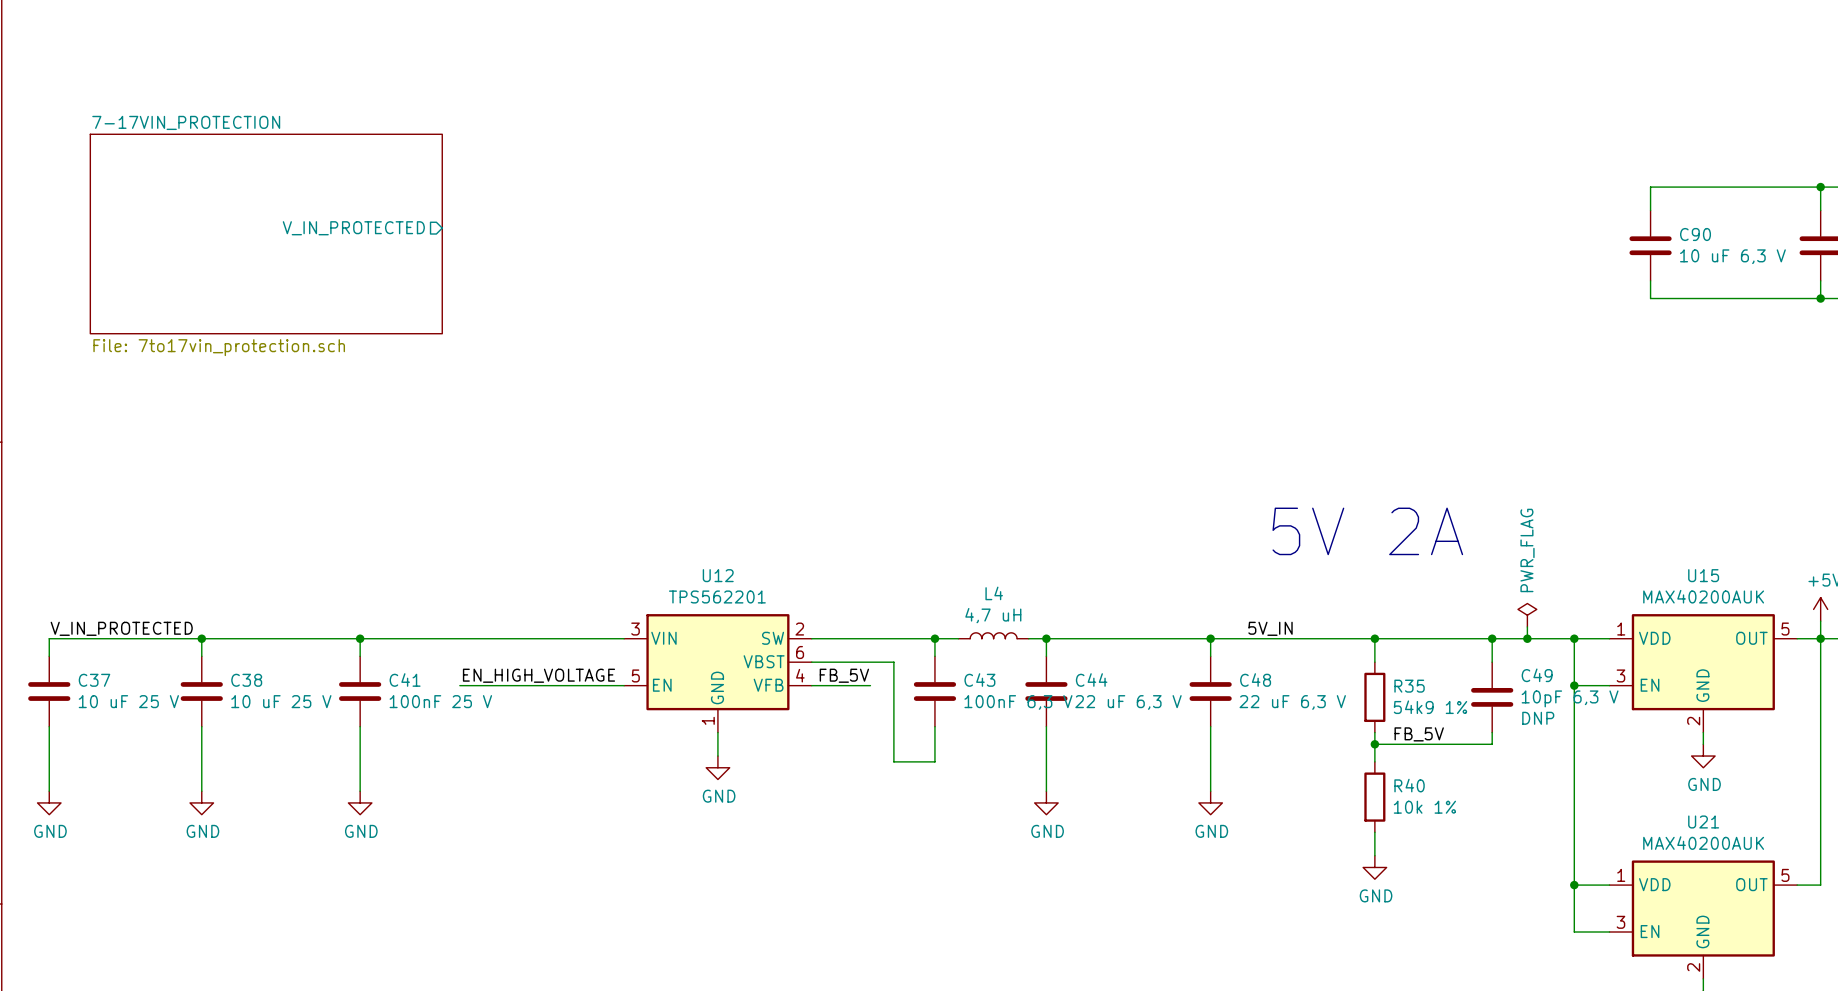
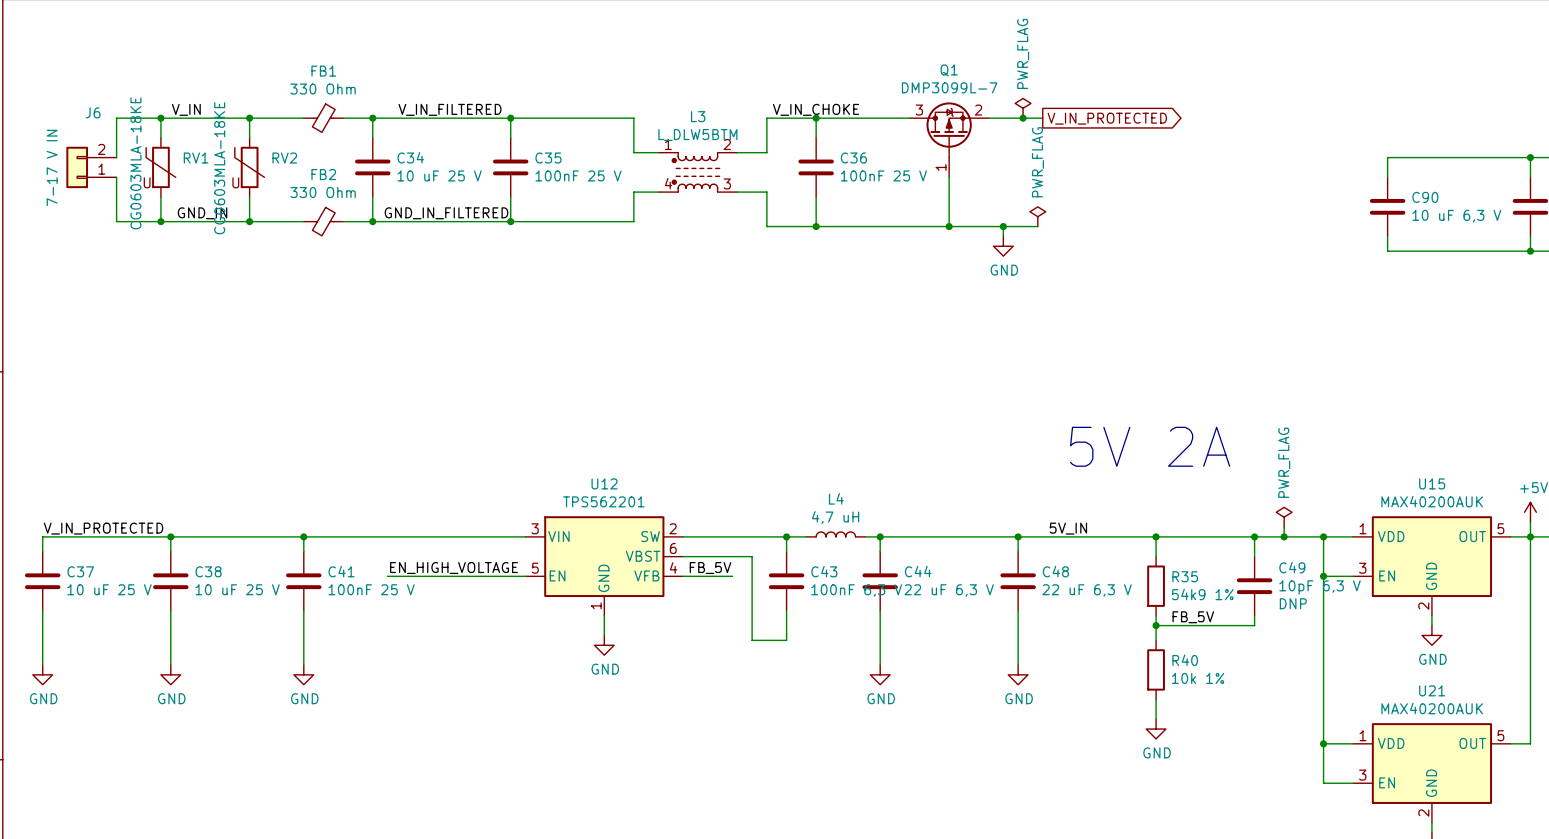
power symbol: none -> PWR_FLAG (1023, 108)
label: none -> V_IN (186, 109)
label: none -> V_IN_FILTERED (450, 109)
label: none -> V_IN_CHOKE (815, 109)
wire: none -> (160, 118) (160, 137)
junction: none -> (160, 118)
wire: none -> (249, 118) (249, 137)
junction: none -> (249, 118)
wire: none -> (303, 118) (116, 118) (116, 157)
FB1: none -> 330 Ohm (323, 118)
wire: none -> (343, 118) (633, 118) (633, 152) (658, 152)
junction: none -> (372, 118)
wire: none -> (510, 118) (510, 137)
junction: none -> (510, 118)
wire: none -> (816, 118) (816, 137)
junction: none -> (816, 118)
wire: none -> (909, 118) (766, 118) (766, 152) (737, 152)
wire: none -> (988, 118) (1042, 118)
junction: none -> (1023, 118)
global label: none -> V_IN_PROTECTED (1107, 118)
Q1: none -> DMP3099L-7 (949, 139)
J6: none -> 7-17 V IN (91, 167)
RV1: none -> CG0603MLA-18KE (160, 167)
RV2: none -> CG0603MLA-18KE (249, 167)
C34: none -> 10 uF 25 V (372, 167)
C35: none -> 100nF 25 V (510, 167)
C36: none -> 100nF 25 V (816, 167)
L3: none -> L_DLW5BTM (697, 172)
wire: none -> (116, 177) (116, 221) (303, 221)
wire: none -> (949, 177) (949, 226)
sheet pin: V_IN_PROTECTED (353, 228) -> none
wire: none -> (658, 192) (633, 192) (633, 221) (343, 221)
wire: none -> (737, 192) (766, 192) (766, 226) (1037, 226)
wire: none -> (160, 197) (160, 221)
sheet 7-17VIN_PROTECTION: File: 7to17vin_protection.sch (266, 234) -> none
wire: none -> (249, 197) (249, 221)
wire: none -> (510, 197) (510, 221)
wire: none -> (816, 197) (816, 226)
label: none -> GND_IN (202, 213)
label: none -> GND_IN_FILTERED (446, 213)
power symbol: none -> PWR_FLAG (1037, 216)
junction: none -> (160, 221)
junction: none -> (249, 221)
FB2: none -> 330 Ohm (323, 221)
junction: none -> (372, 221)
junction: none -> (510, 221)
junction: none -> (816, 226)
junction: none -> (949, 226)
wire: none -> (1003, 226) (1003, 236)
junction: none -> (1003, 226)
power symbol: none -> GND (1003, 246)

